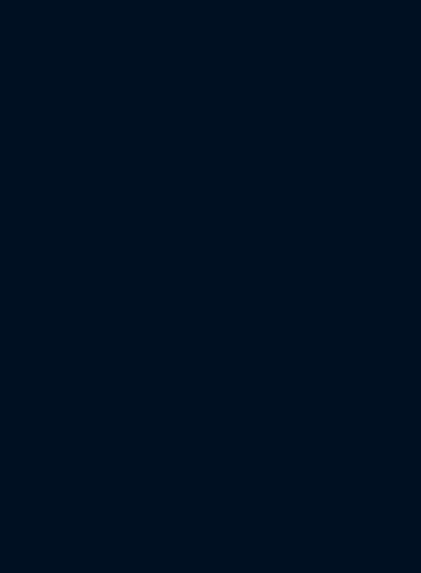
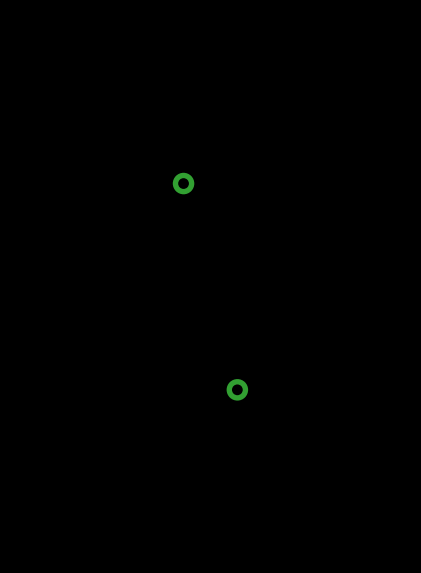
via: none -> (183, 183)
via: none -> (237, 389)

